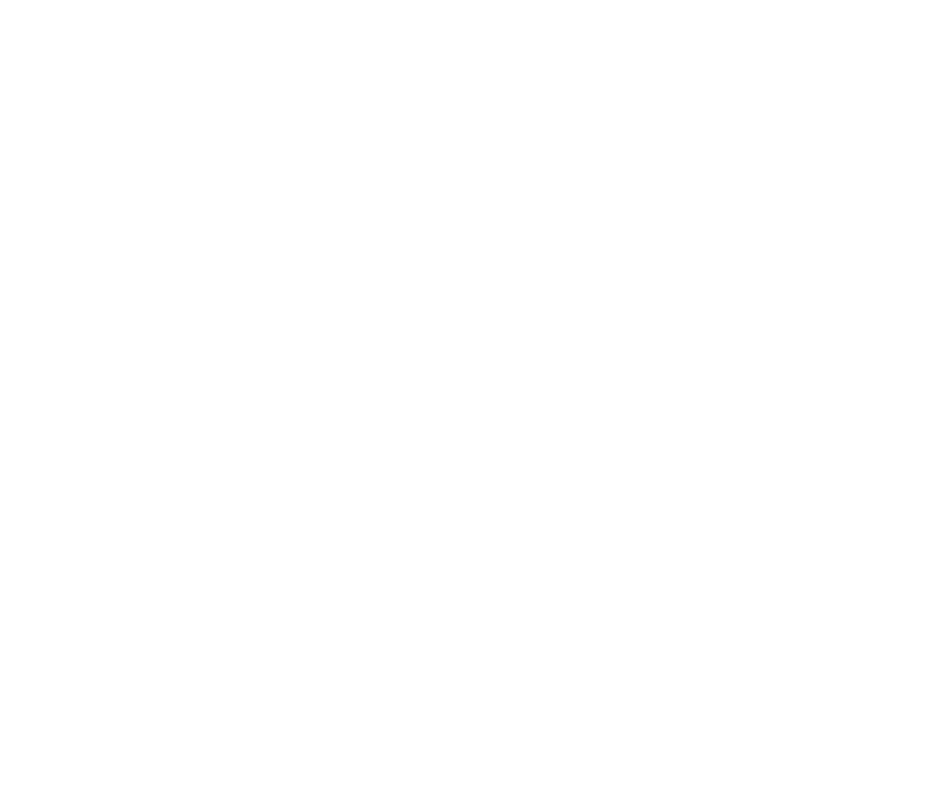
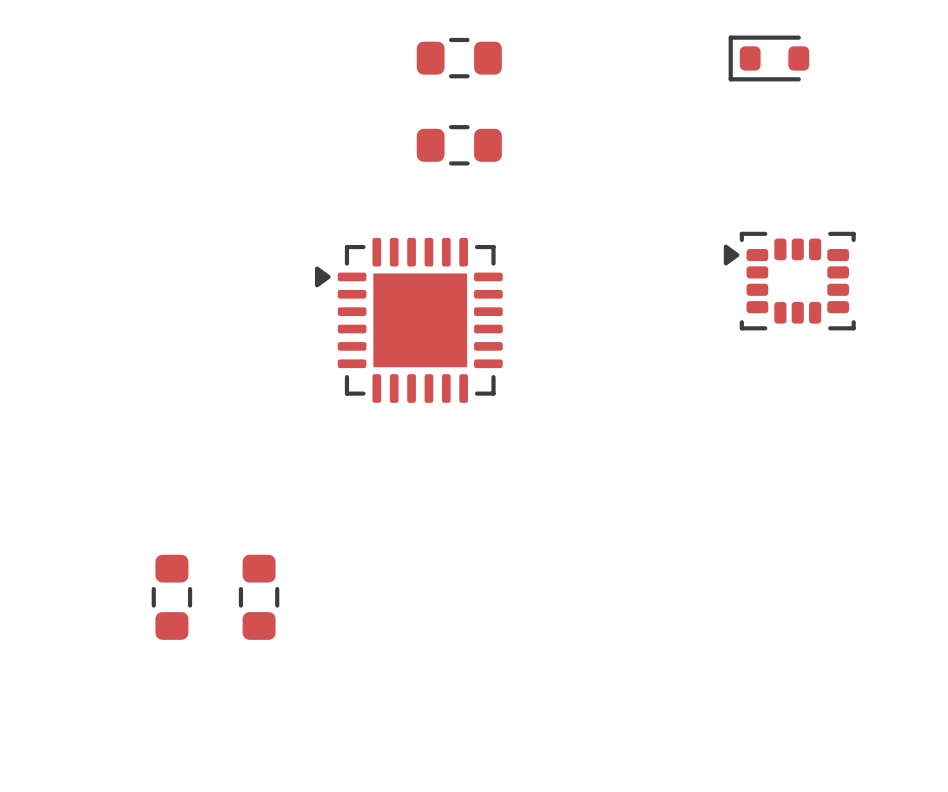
part: none -> (459, 58)
part: none -> (768, 58)
part: none -> (459, 145)
part: none -> (789, 281)
part: none -> (408, 320)
part: none -> (171, 597)
part: none -> (259, 597)

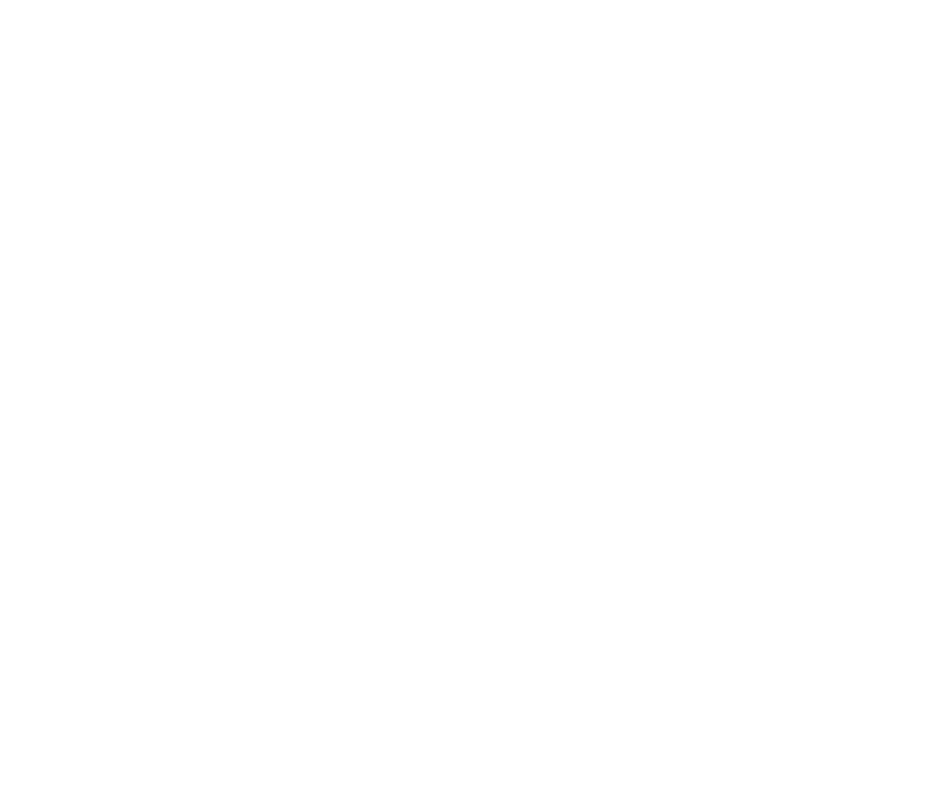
part: (459, 58) -> none
part: (768, 58) -> none
part: (459, 145) -> none
part: (789, 281) -> none
part: (408, 320) -> none
part: (171, 597) -> none
part: (259, 597) -> none

